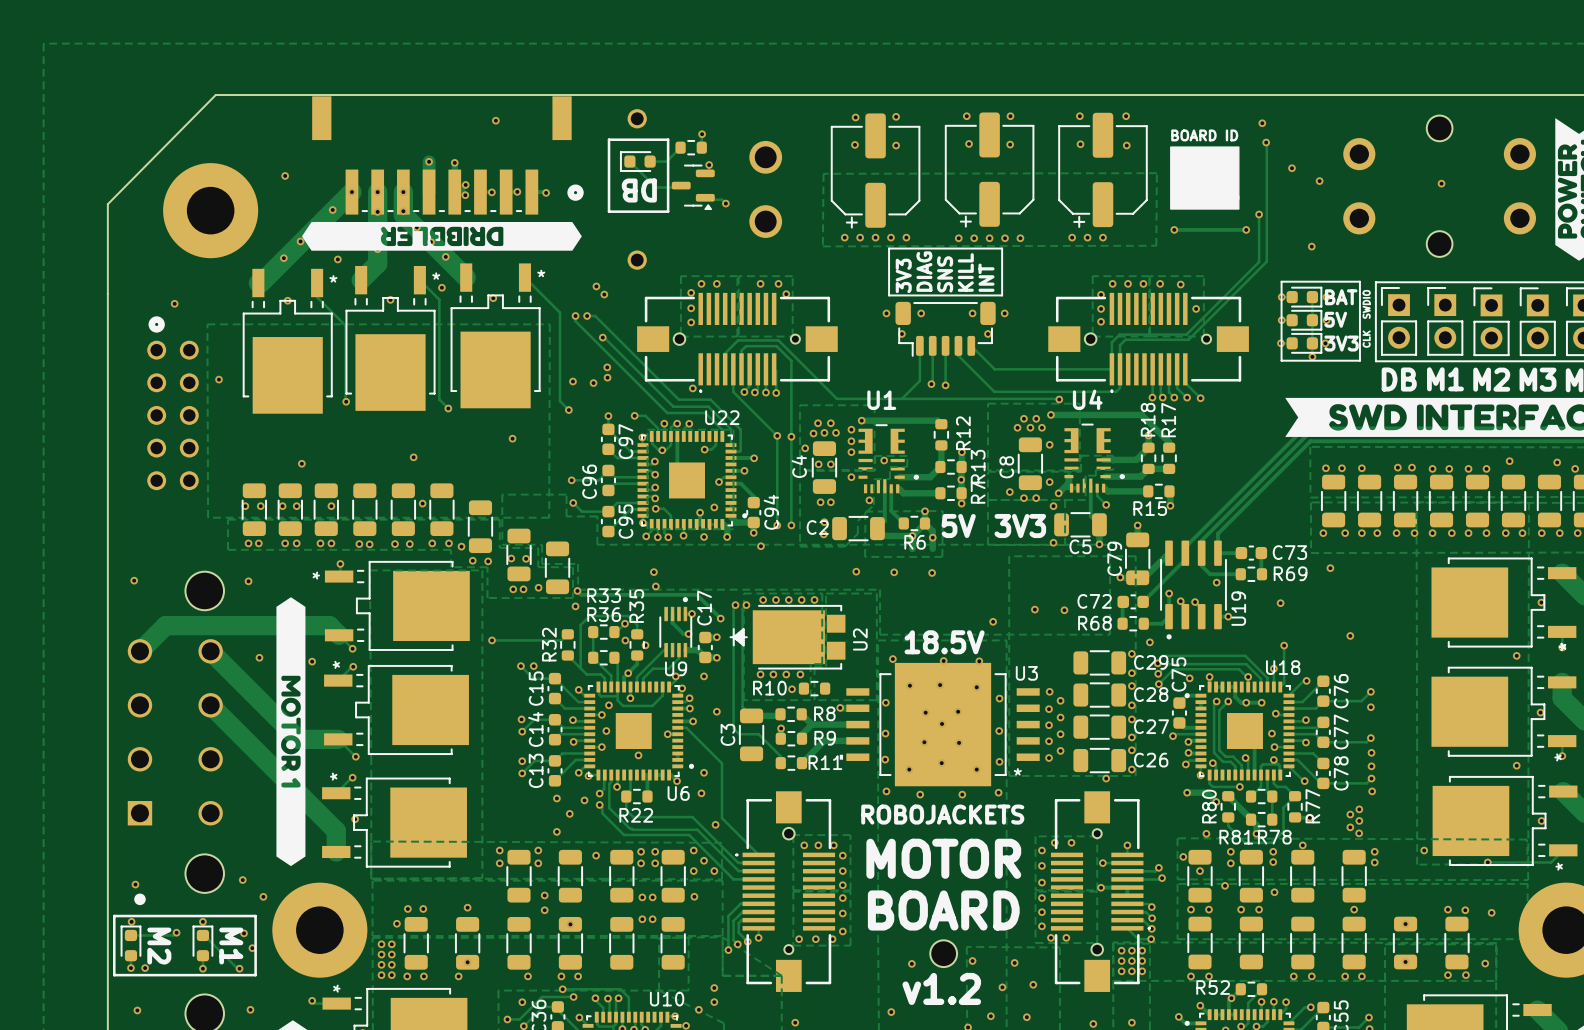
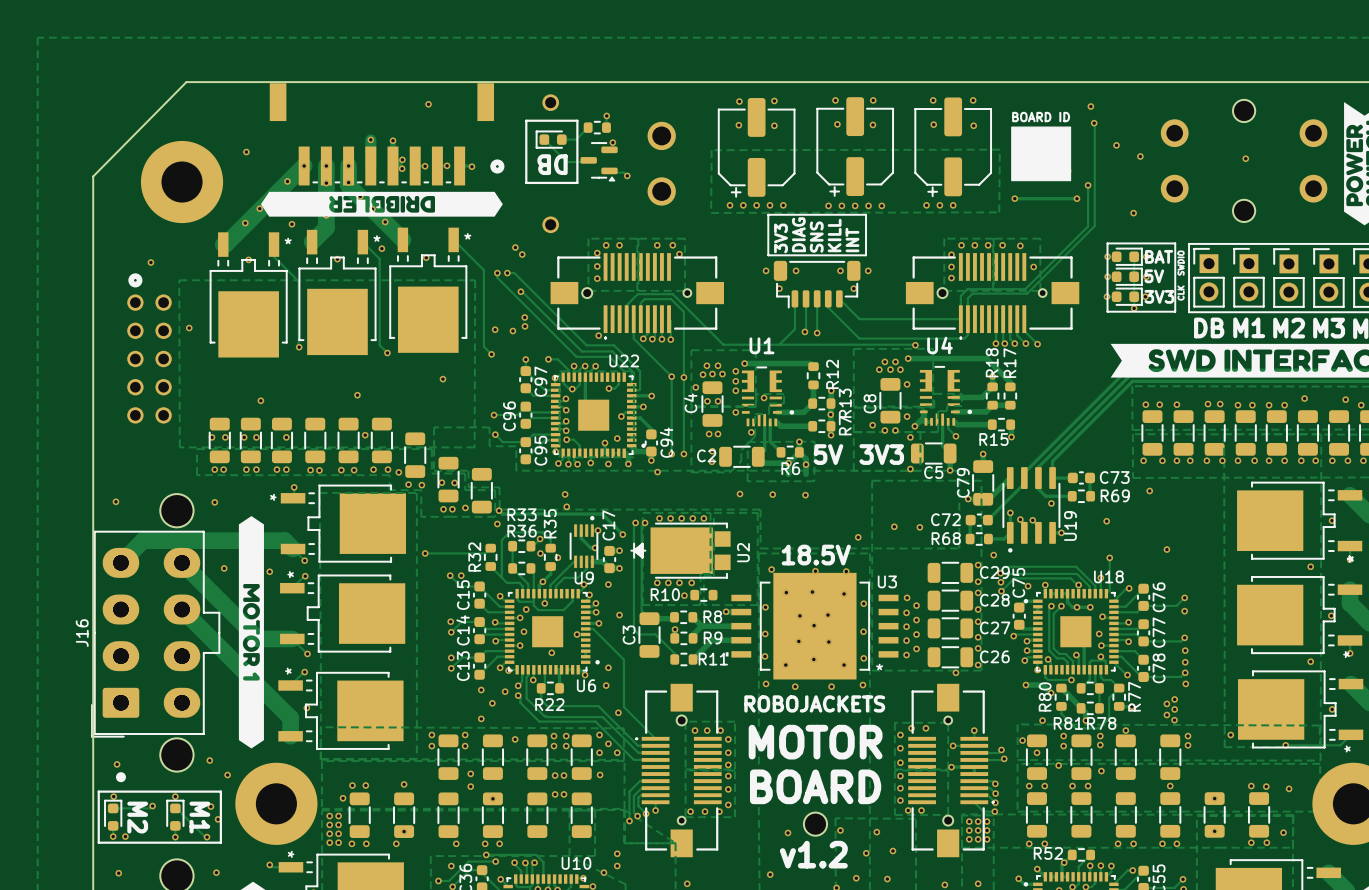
J16: none -> (155, 634)

